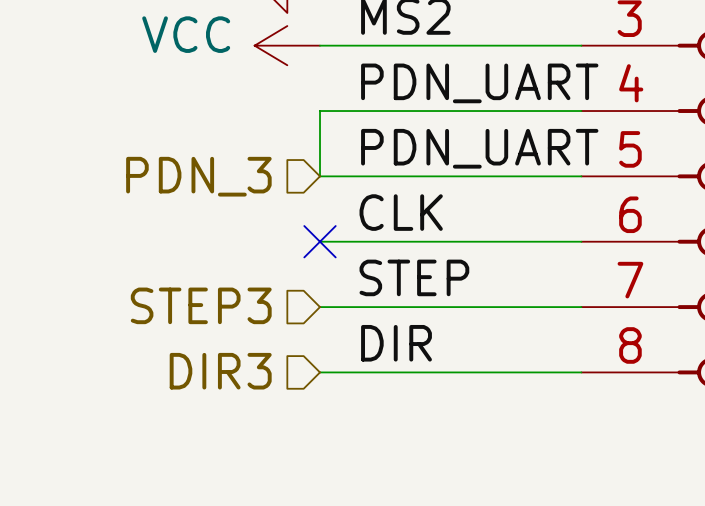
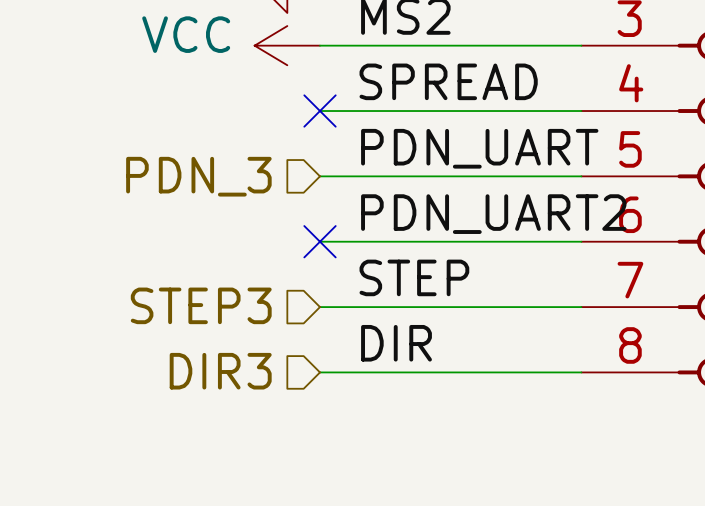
label: PDN_UART (479, 83) -> SPREAD (448, 81)
wire: (320, 111) (320, 176) -> none
no-connect mark: none -> (320, 111)
label: CLK (401, 212) -> PDN_UART2 (493, 214)

